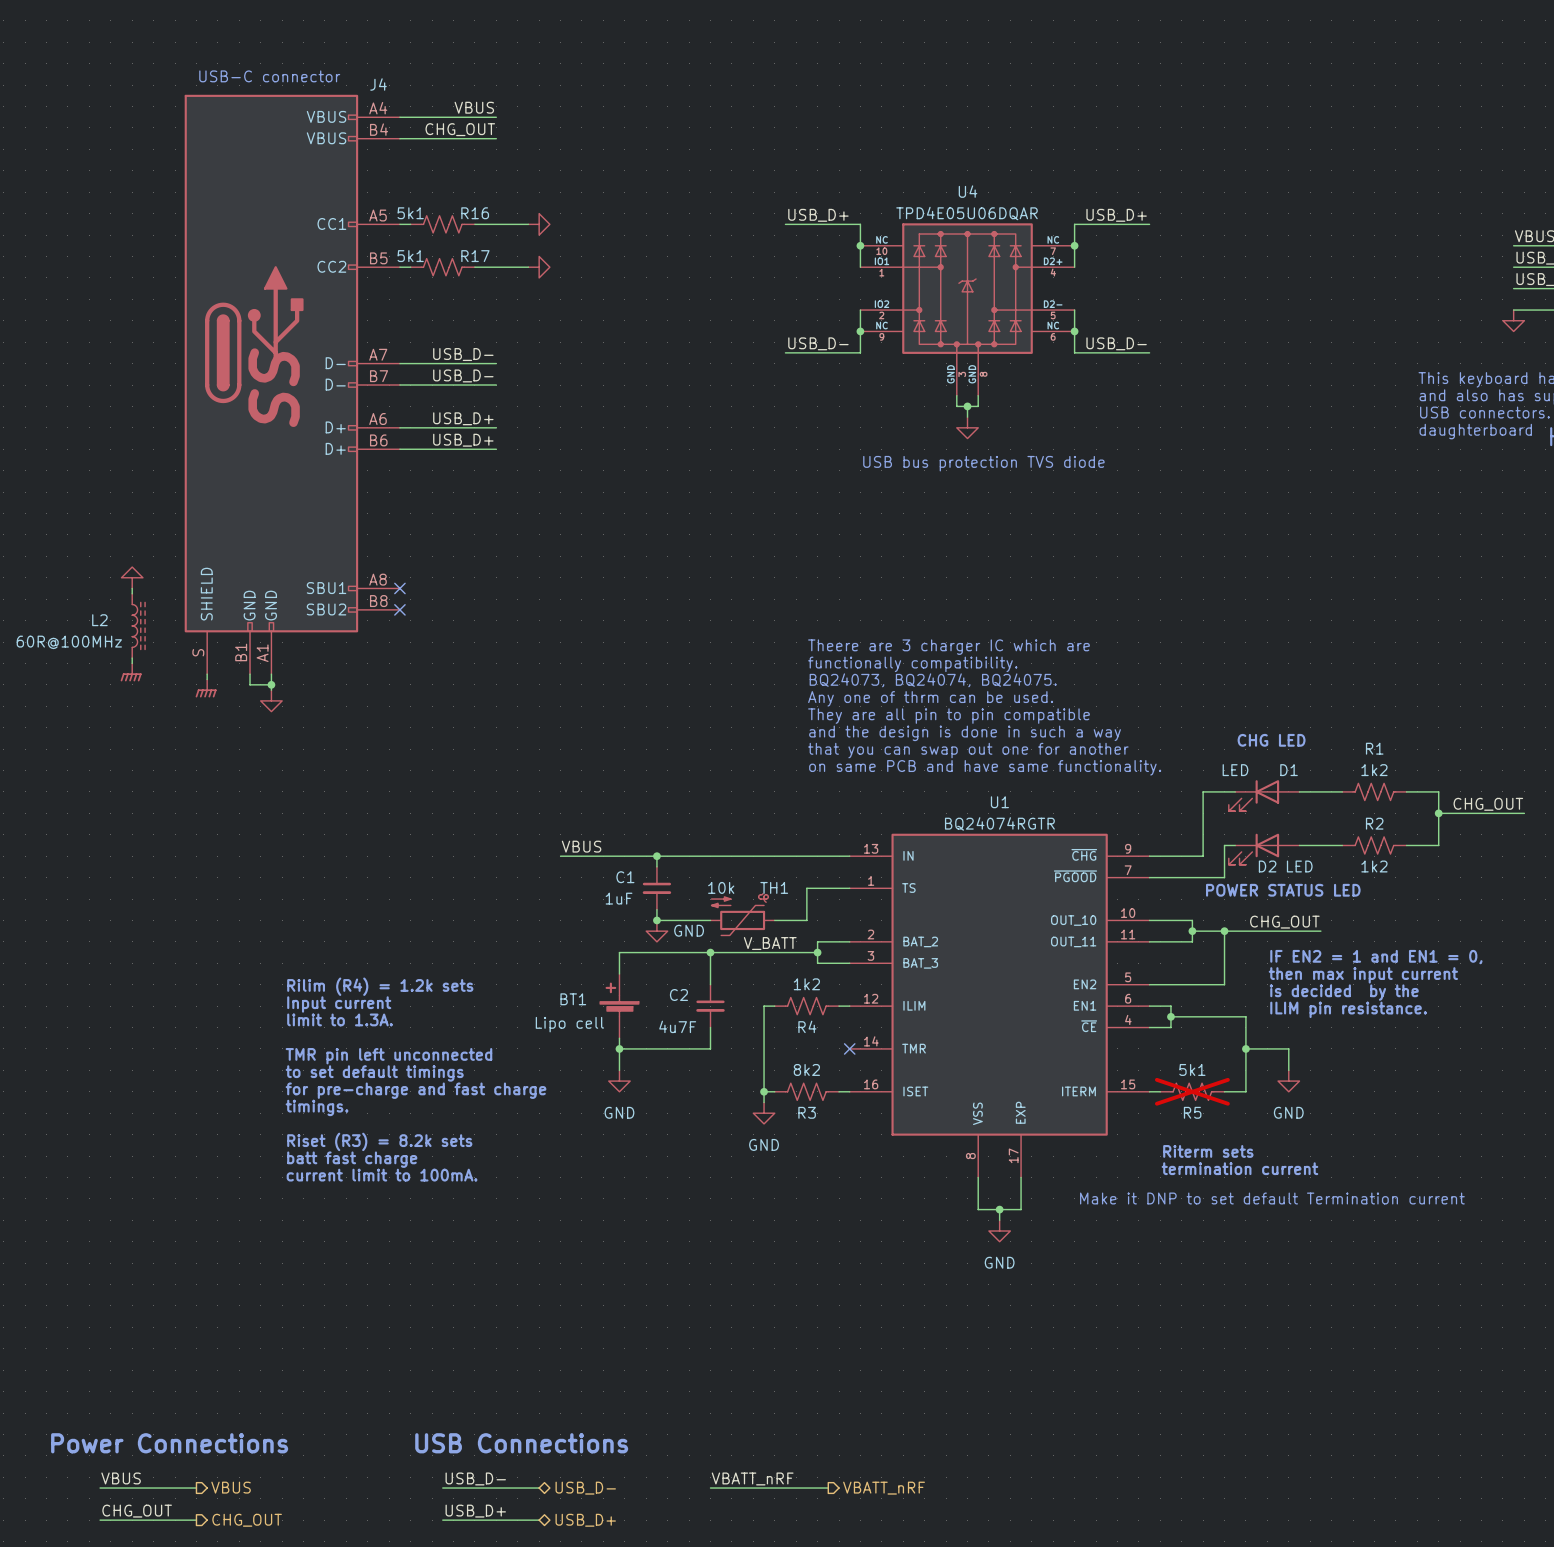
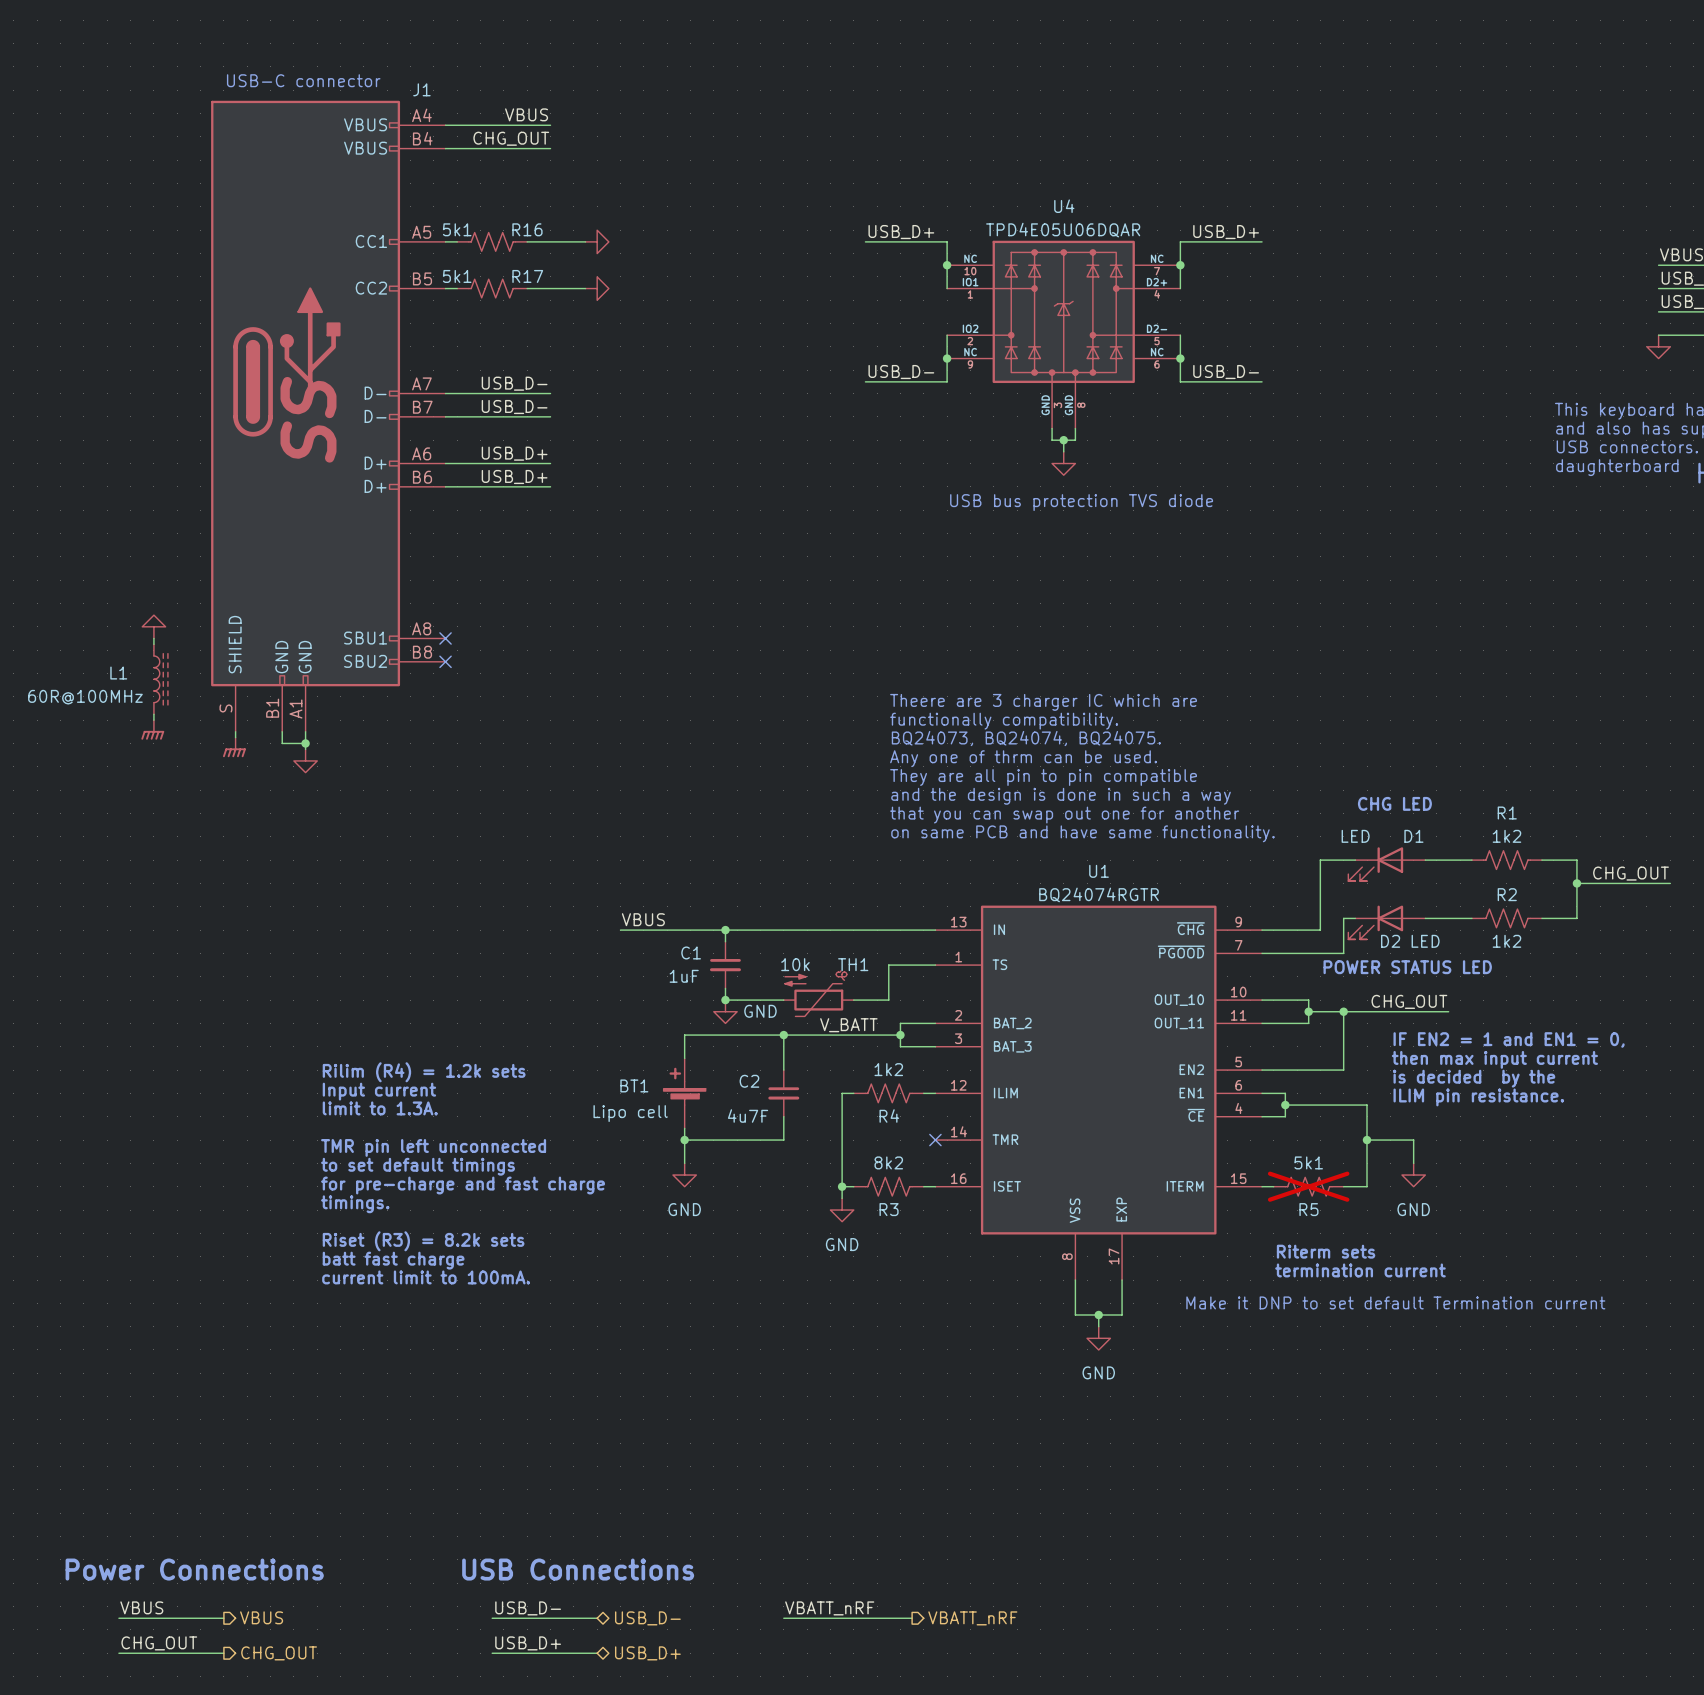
J4 name: J4 (378, 84) -> J1 (421, 89)
L2 name: L2 (99, 620) -> L1 (118, 673)

